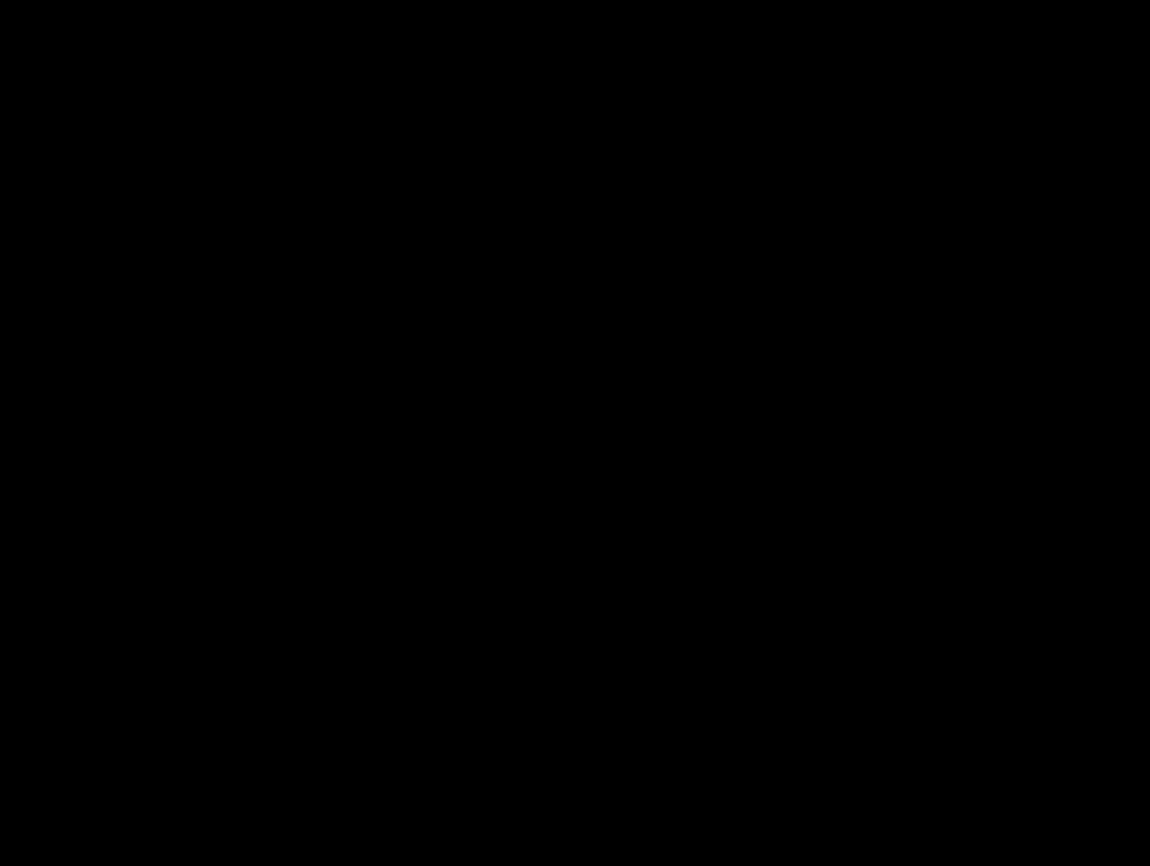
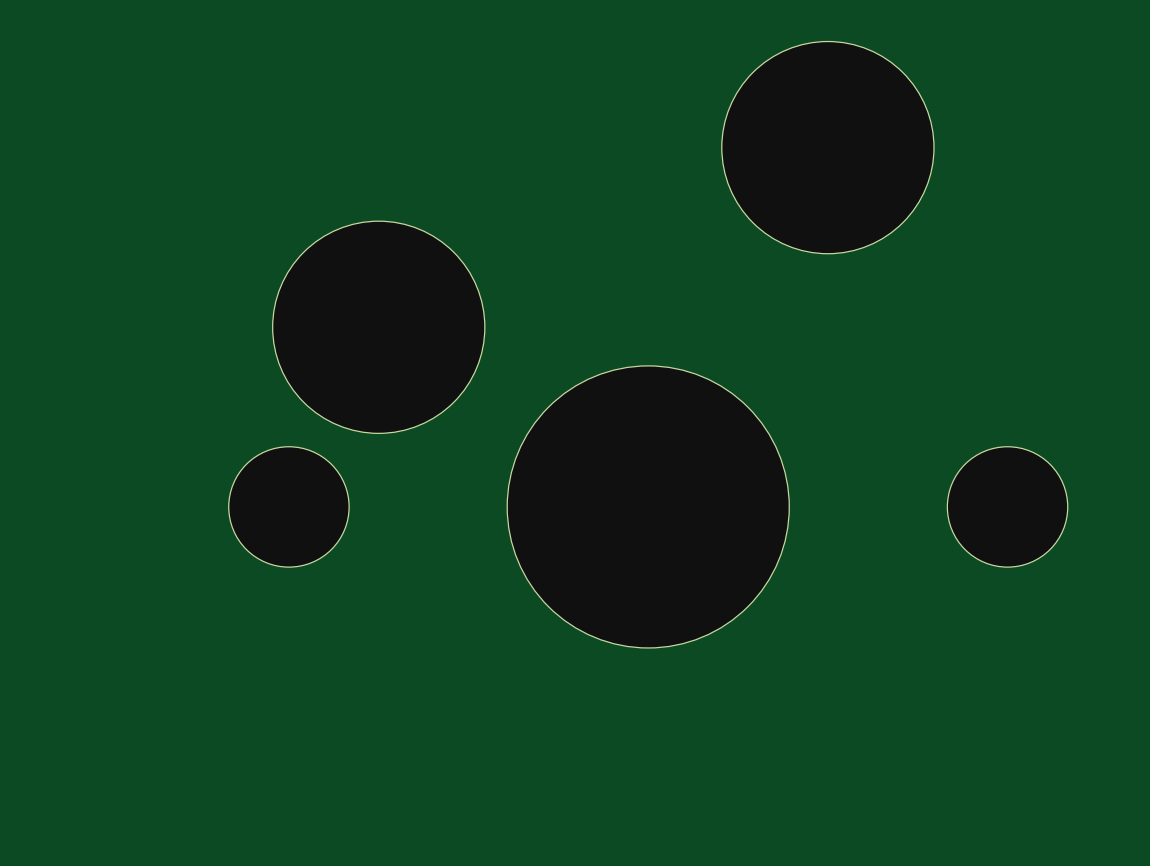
part: none -> (648, 344)

